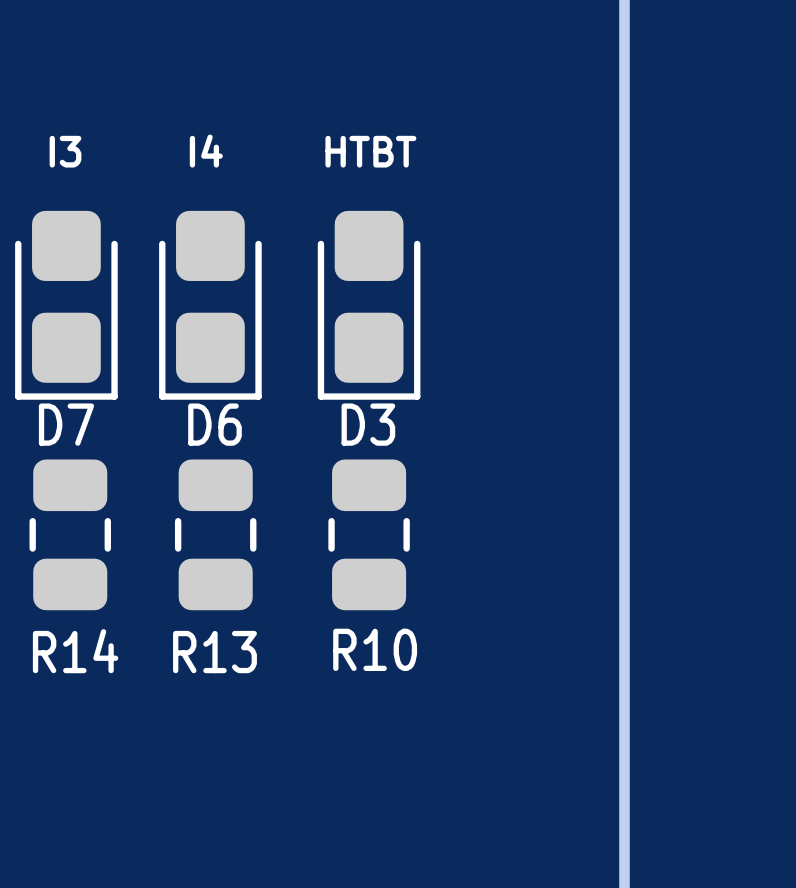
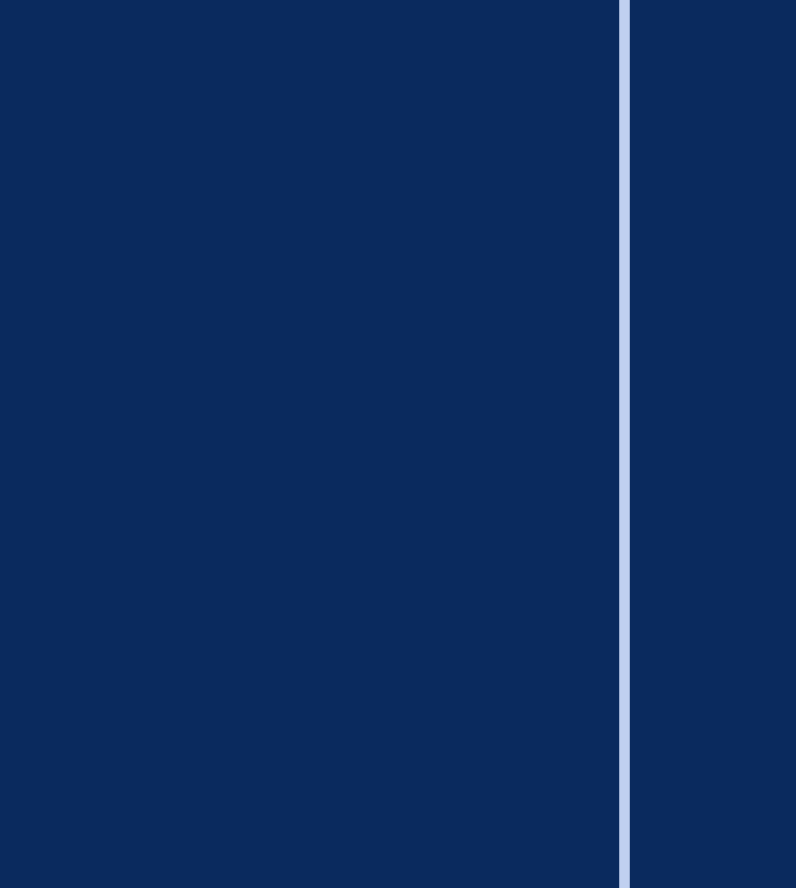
text: I3 (65, 151) -> none
text: I4 (206, 151) -> none
text: HTBT (370, 151) -> none
D7: (66, 305) -> none
D6: (210, 305) -> none
D3: (369, 305) -> none
R14: (70, 534) -> none
R13: (215, 534) -> none
R10: (369, 534) -> none

